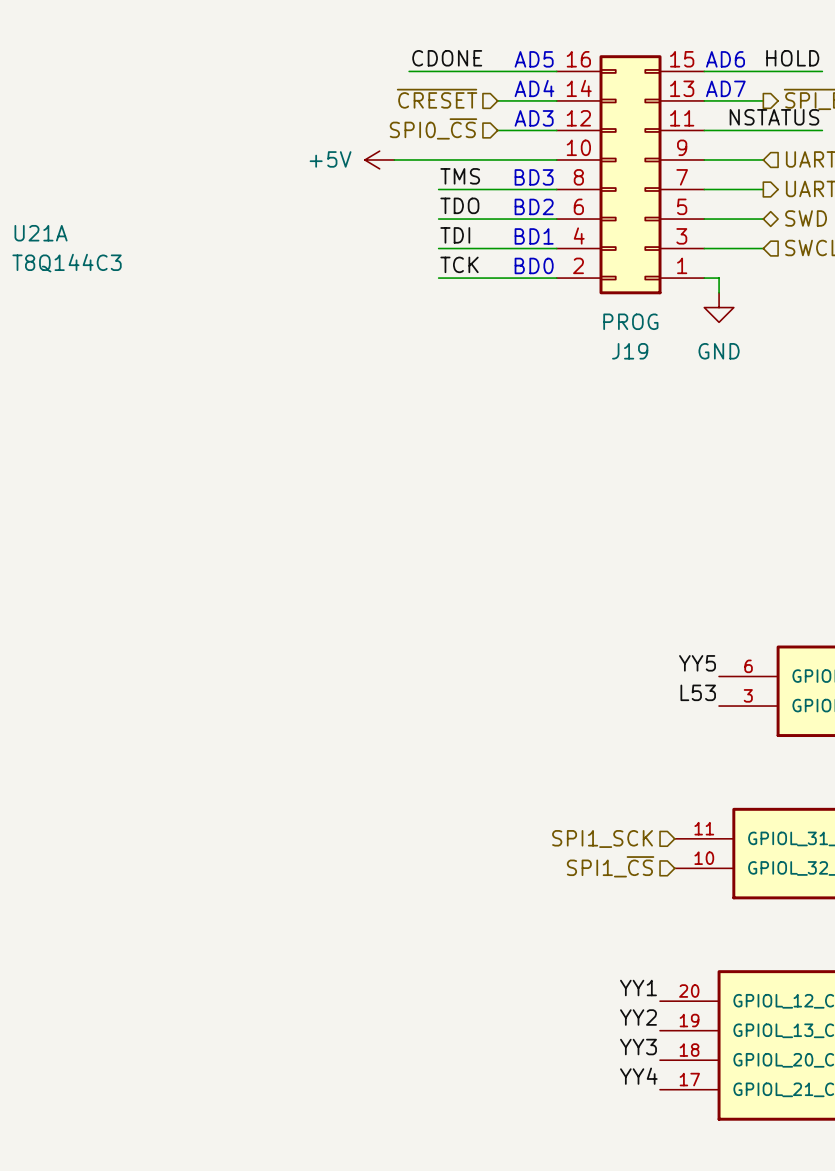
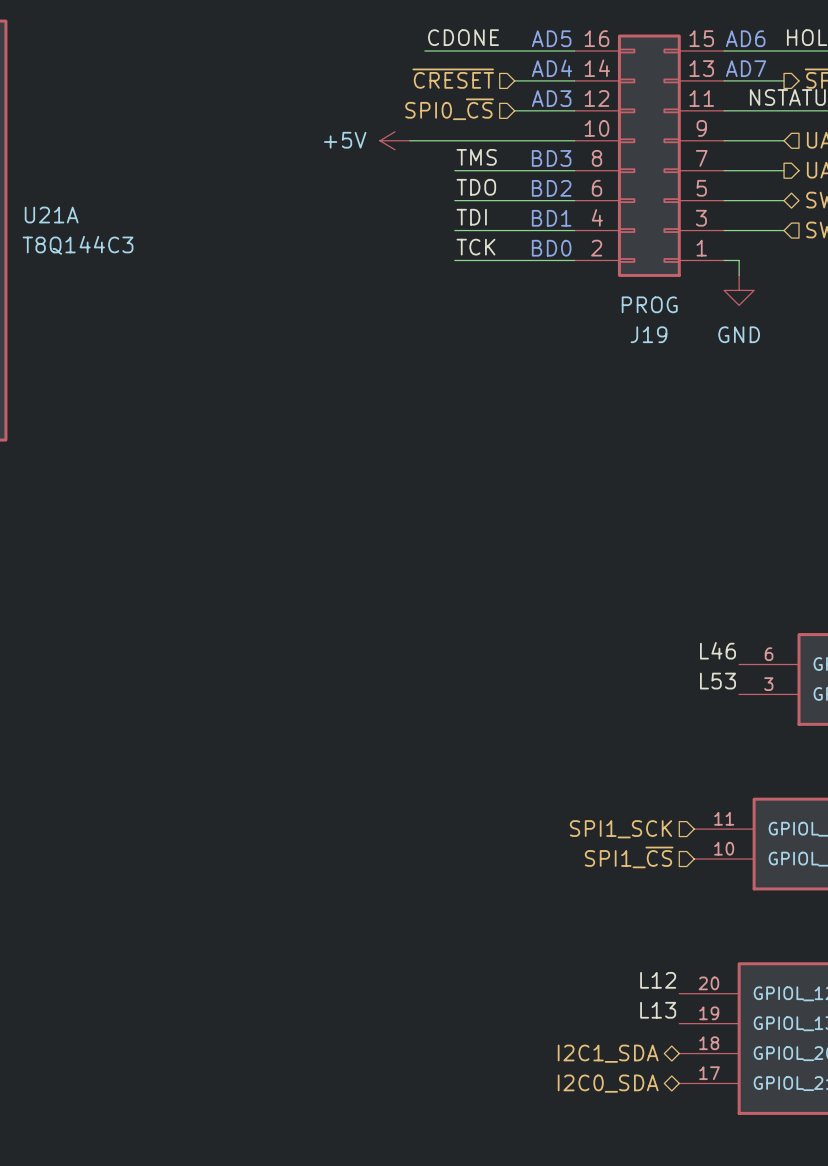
label: YY5 (697, 663) -> L46 (718, 650)
label: YY1 (638, 988) -> L12 (658, 980)
label: YY2 (638, 1017) -> L13 (658, 1010)
label: YY3 (638, 1047) -> none
hierarchical label: none -> I2C1_SDA (608, 1053)
label: YY4 (638, 1076) -> none
hierarchical label: none -> I2C0_SDA (608, 1083)

